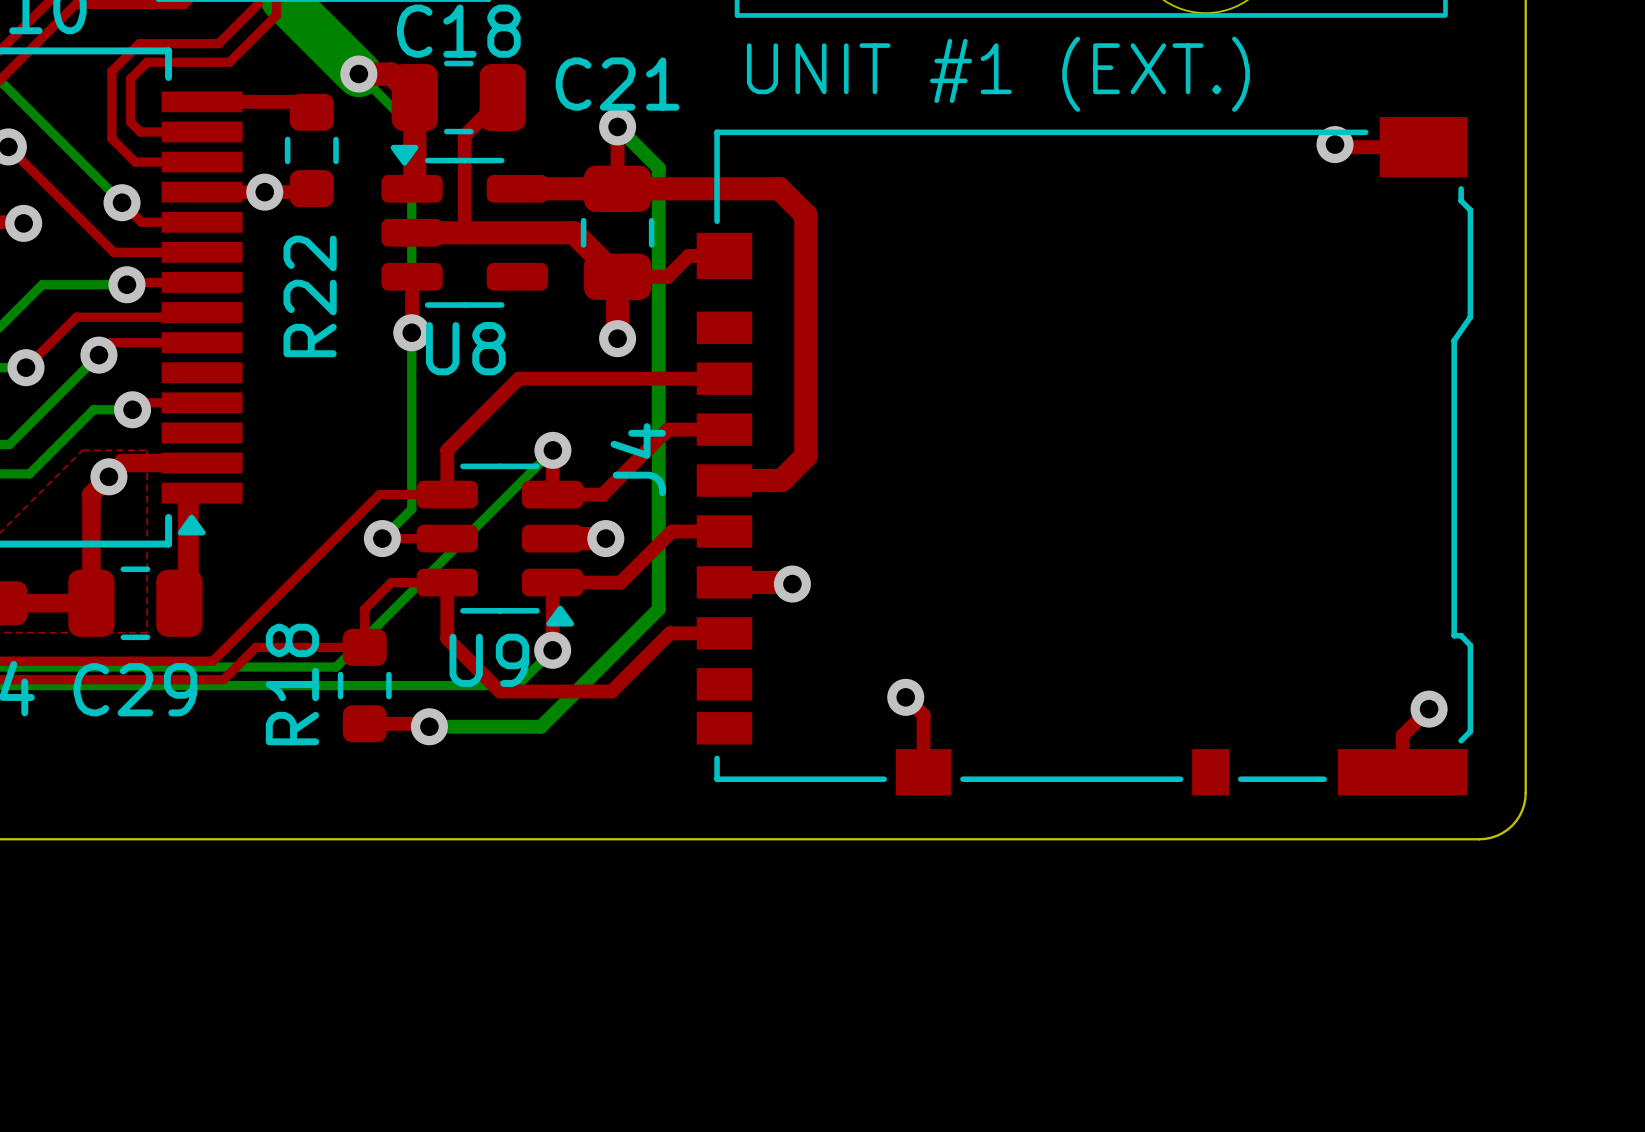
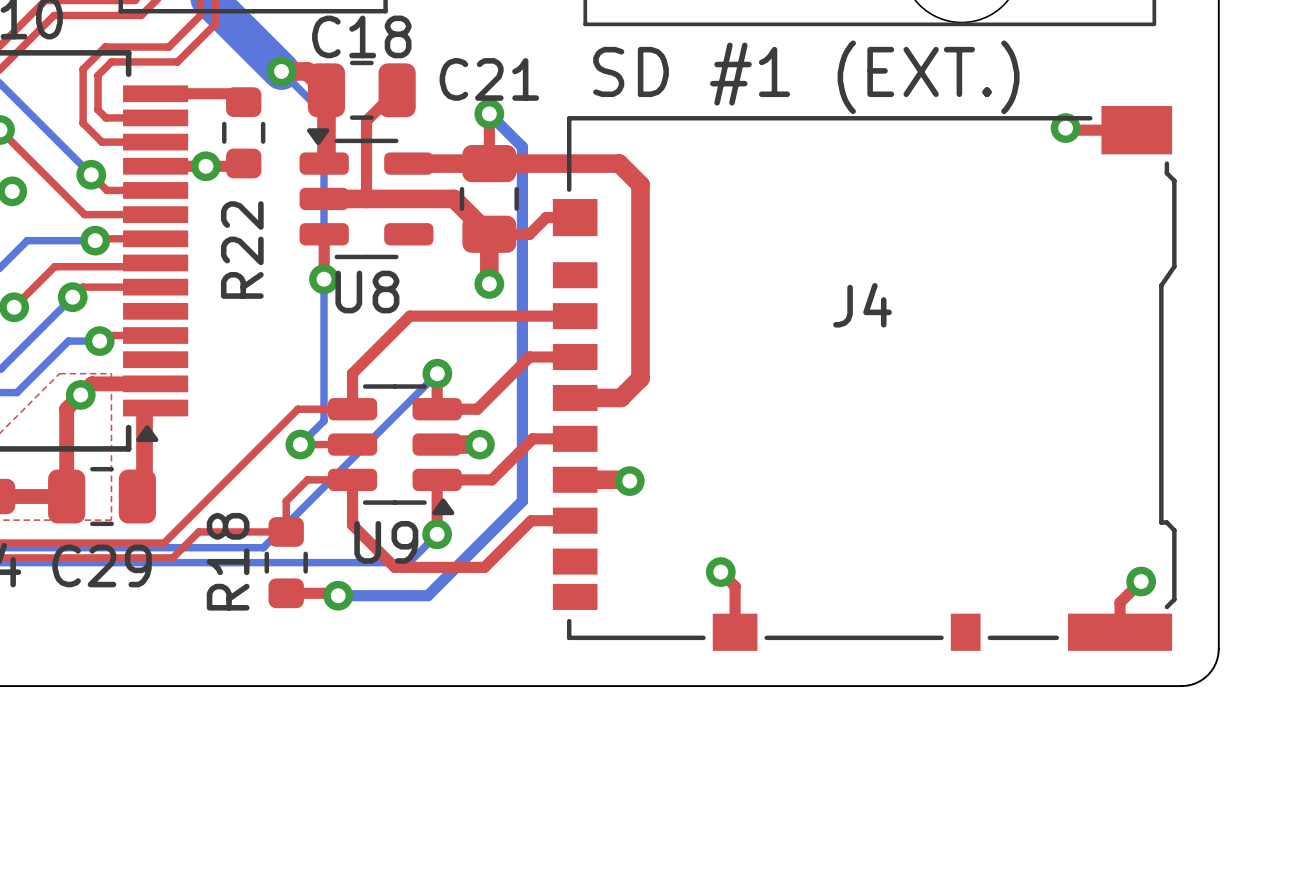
text: UNIT #1 (EXT.) (998, 74) -> SD #1 (EXT.) (806, 77)
J4 name rotation: 0° (638, 459) -> 90° clockwise (862, 305)
J4 name position: J4 (638, 459) -> J4 (862, 305)

